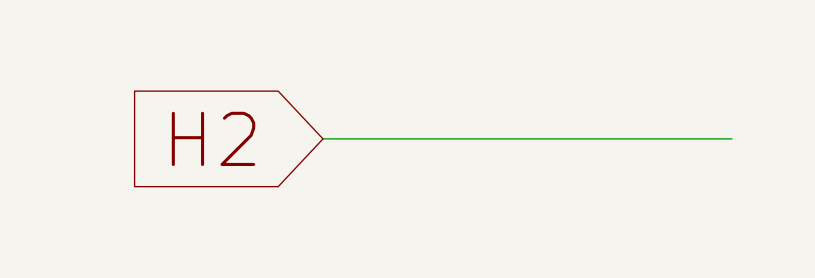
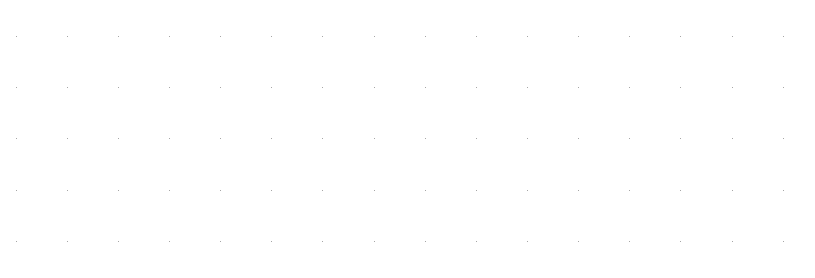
global label: H2 (213, 138) -> none
wire: (322, 138) (732, 138) -> none

